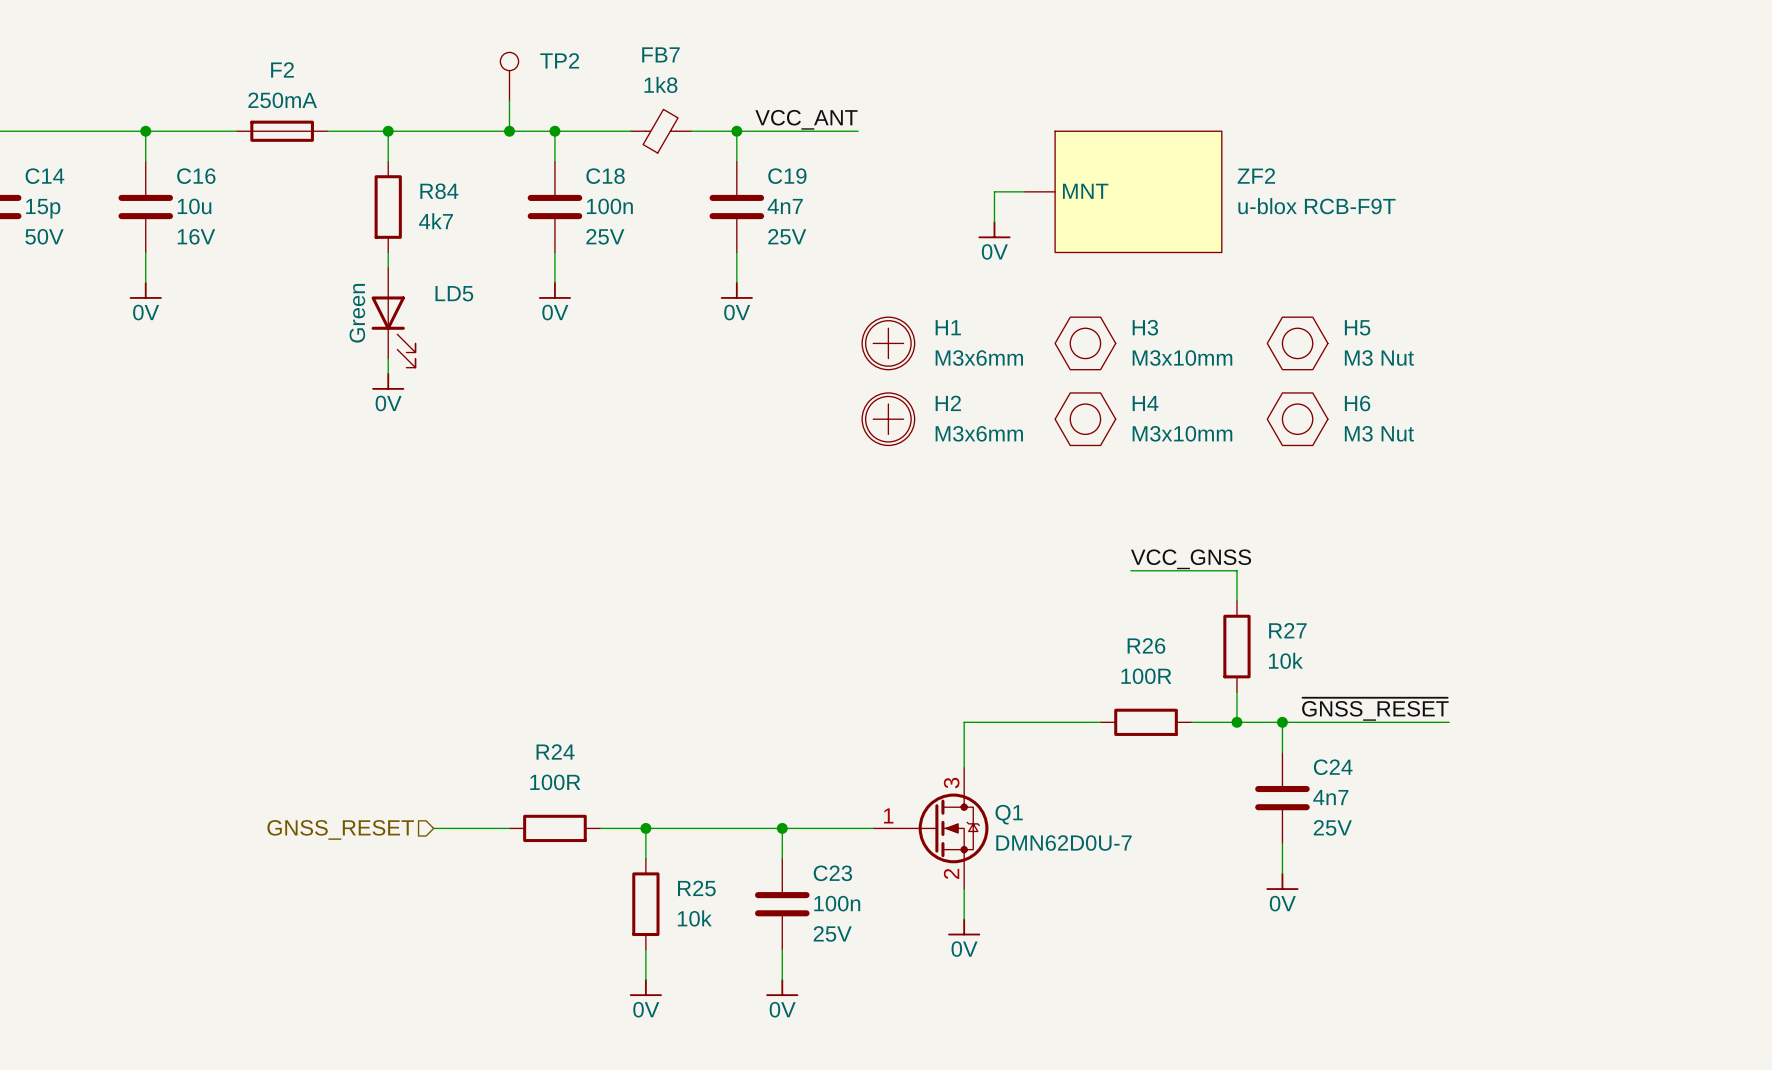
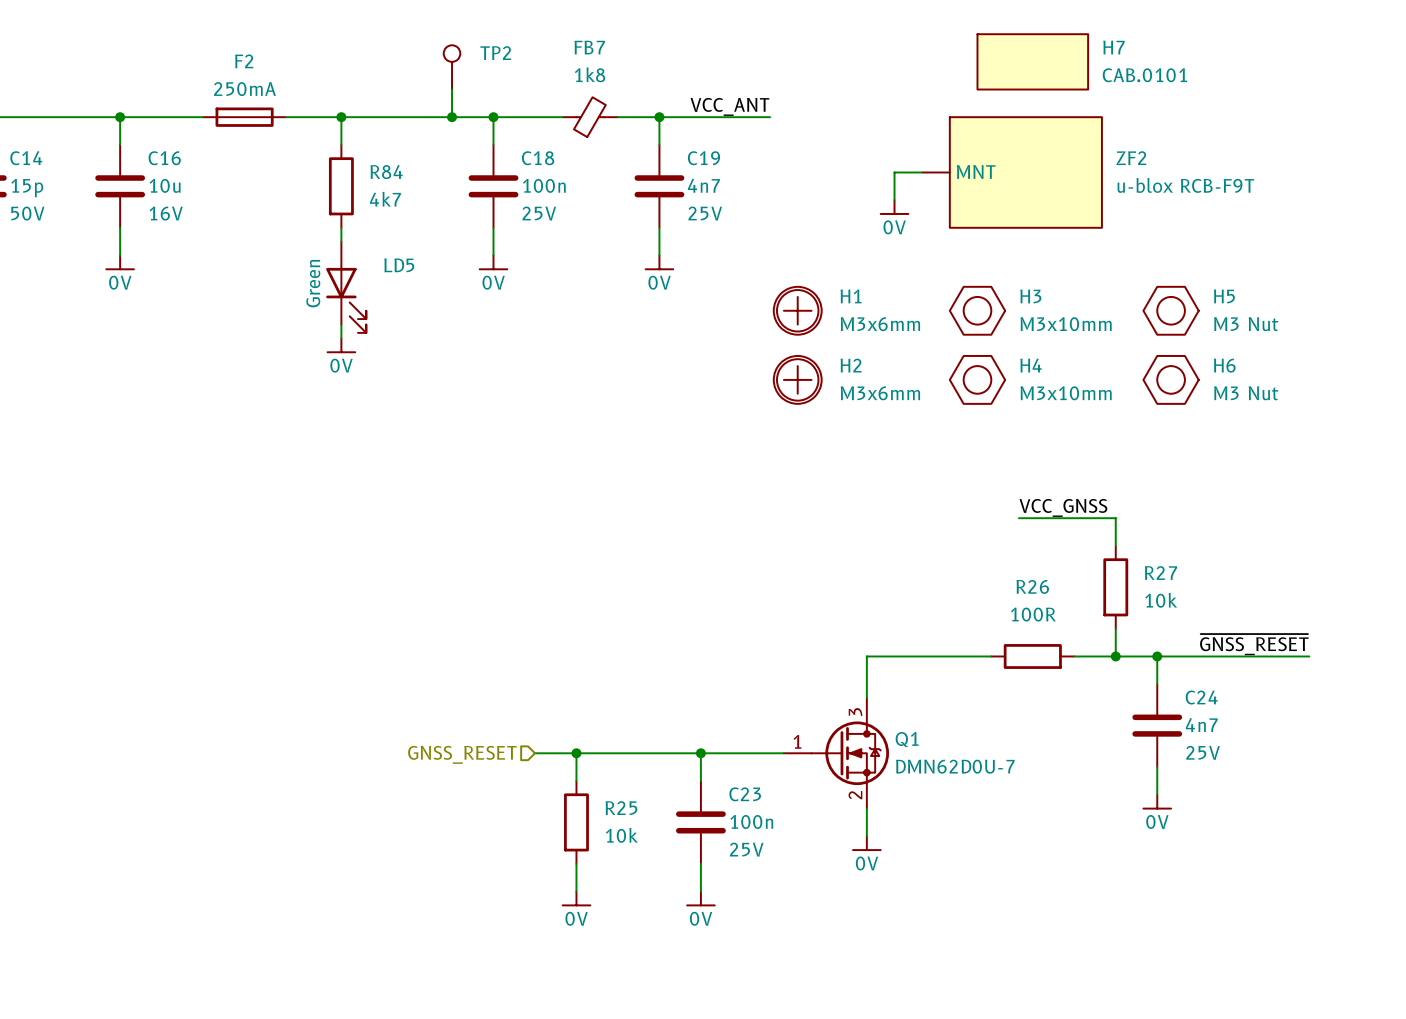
H7: none -> CAB.0101 (1032, 61)
wire: (433, 828) (509, 828) -> none
R24: 100R (554, 828) -> none
hierarchical label position: GNSS_RESET (340, 829) -> GNSS_RESET (462, 754)

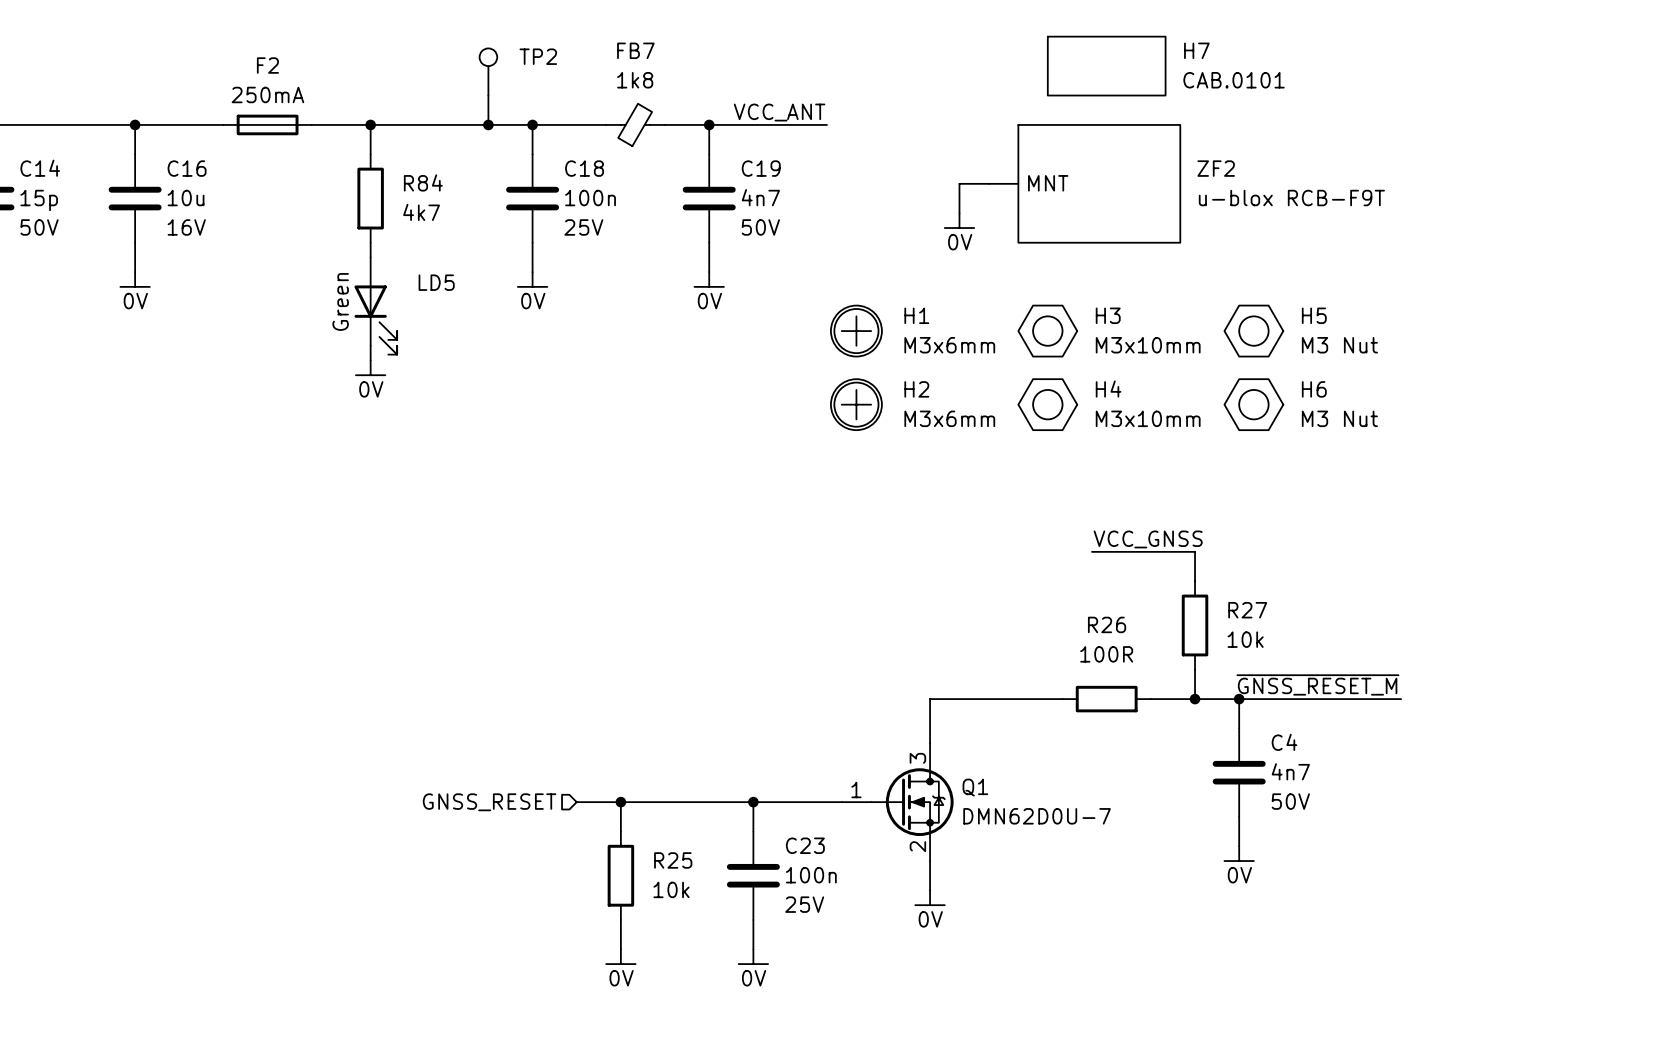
C19 text: 25V (705, 213) -> 50V (760, 227)
label: ~{GNSS_RESET} (1254, 644) -> ~{GNSS_RESET_M} (1317, 684)
C24 name: C24 (1201, 697) -> C4 (1284, 742)
C24 text: 25V (1203, 752) -> 50V (1290, 801)

